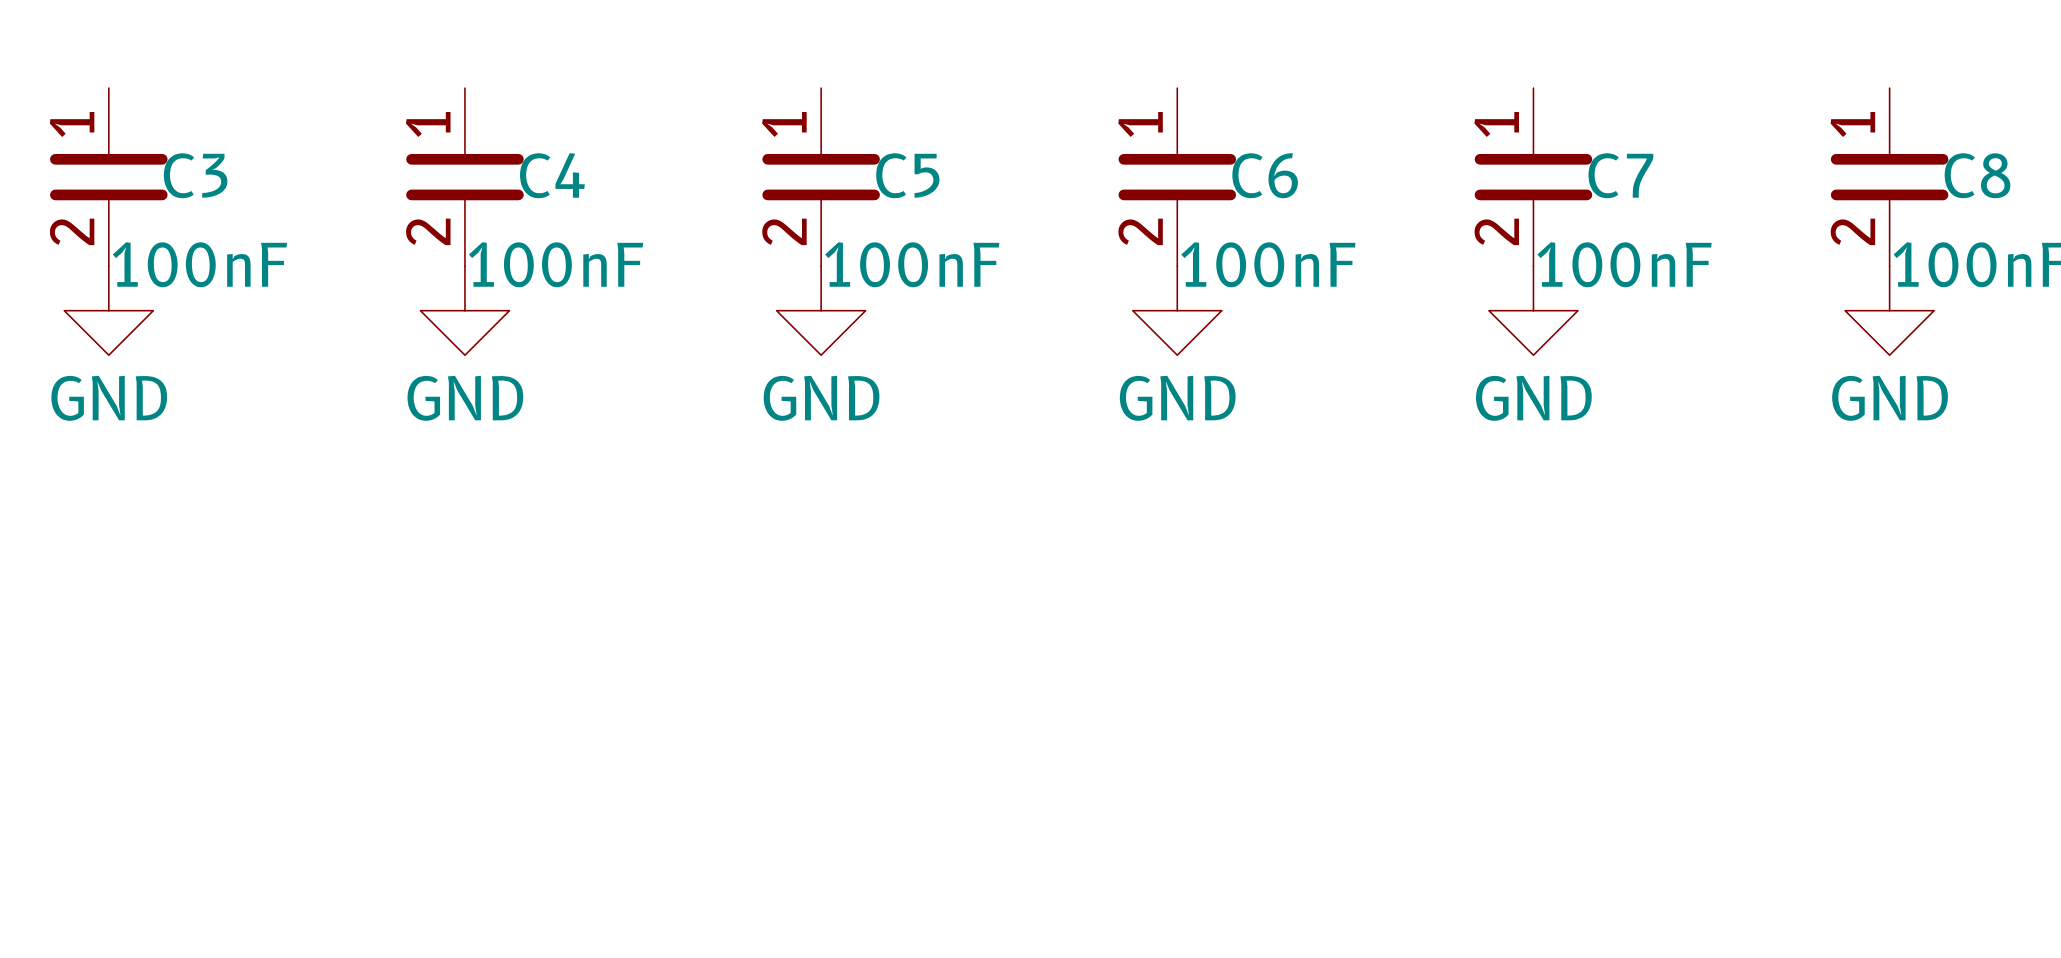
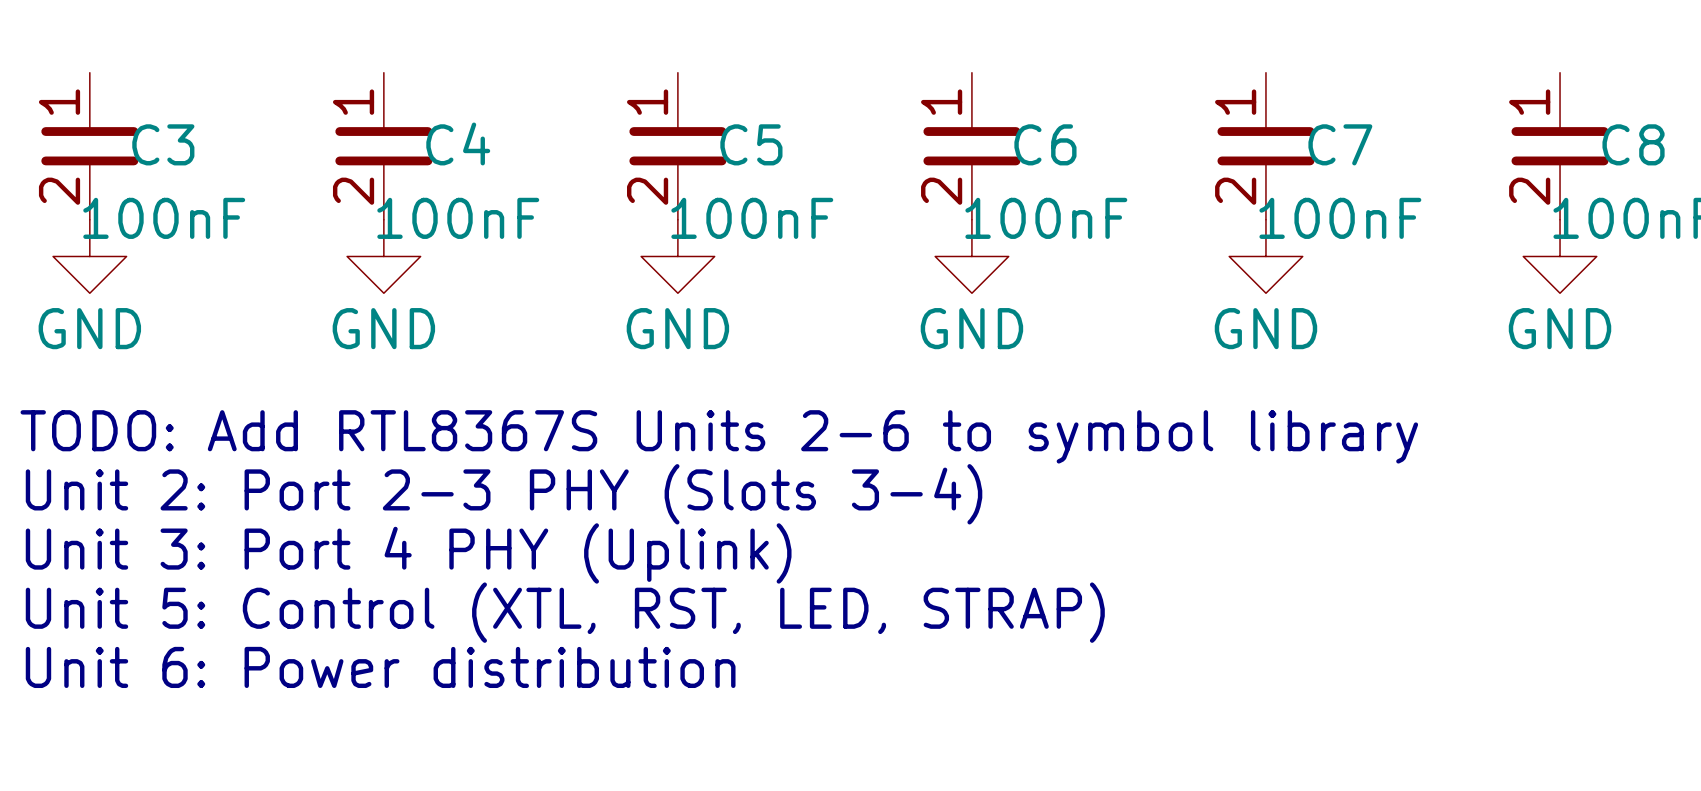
text: none -> TODO: Add RTL8367S Units 2-6 to symbol library (719, 436)
text: none -> Unit 2: Port 2-3 PHY (Slots 3-4) (504, 494)
text: none -> Unit 3: Port 4 PHY (Uplink) (408, 553)
text: none -> Unit 5: Control (XTL, RST, LED, STRAP) (565, 612)
text: none -> Unit 6: Power distribution (380, 667)

